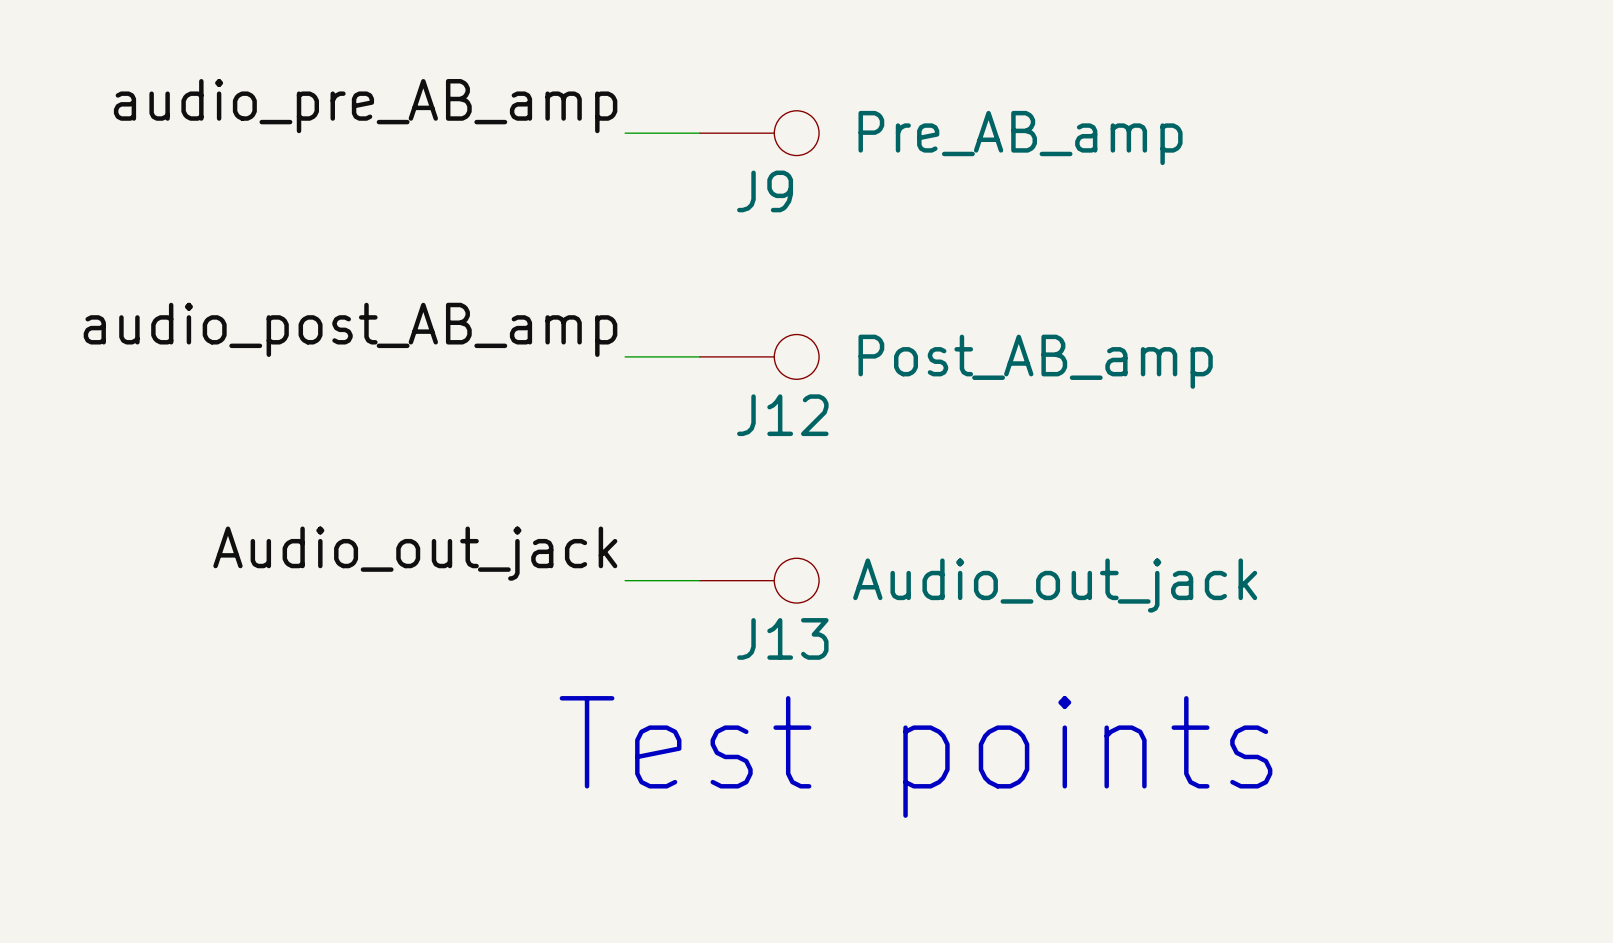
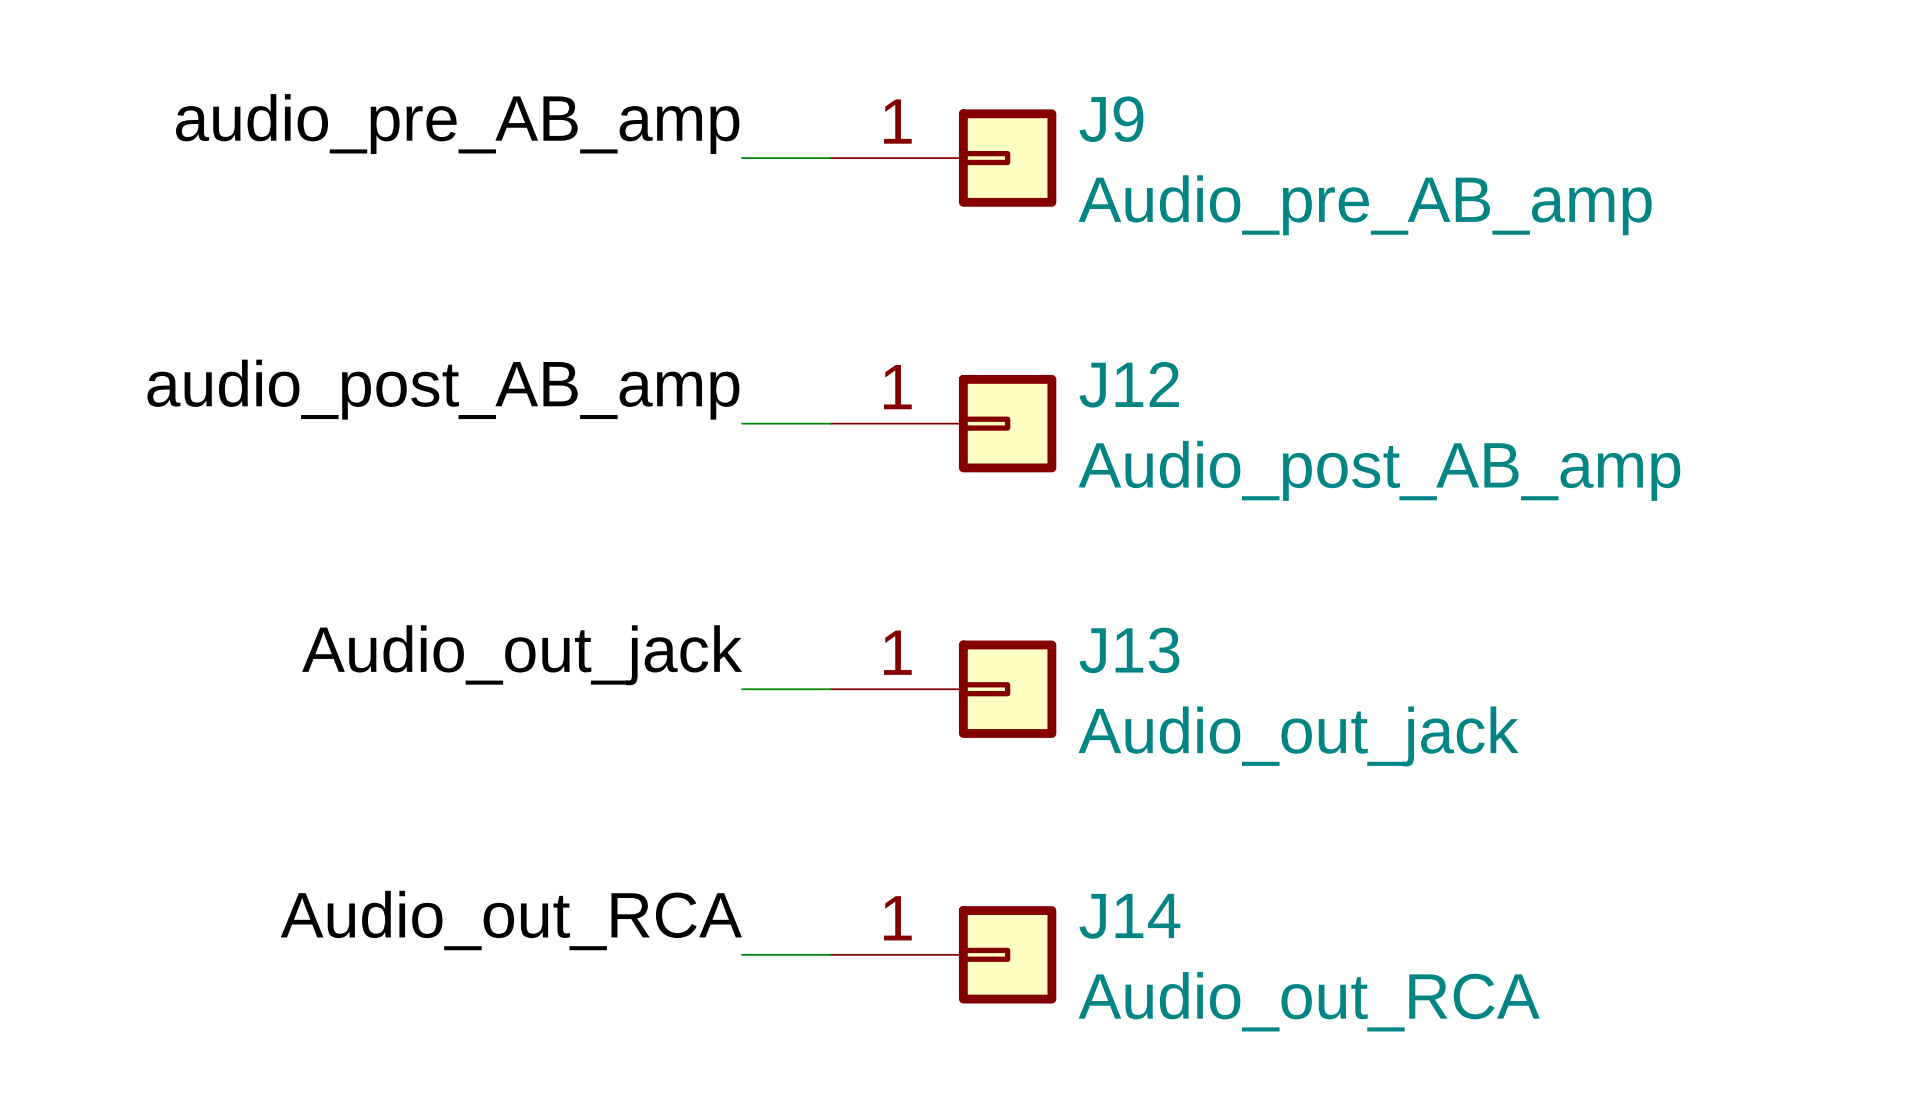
J9 symbol: [699, 110, 820, 156] -> [830, 109, 1057, 207]
J9 value: Pre_AB_amp (1020, 137) -> Audio_pre_AB_amp (1365, 205)
J9 name position: J9 (765, 191) -> J9 (1111, 119)
J12 symbol: [699, 334, 820, 380] -> [830, 374, 1057, 473]
J12 value: Post_AB_amp (1035, 361) -> Audio_post_AB_amp (1379, 470)
J12 name position: J12 (782, 415) -> J12 (1129, 384)
J13 symbol: [699, 558, 820, 604] -> [830, 640, 1057, 738]
J13 name position: J13 (782, 638) -> J13 (1129, 650)
text: Test points (916, 756) -> none
label: none -> Audio_out_RCA (511, 920)
wire: none -> (742, 954) (830, 954)
J14: none -> Audio_out_RCA (943, 954)

